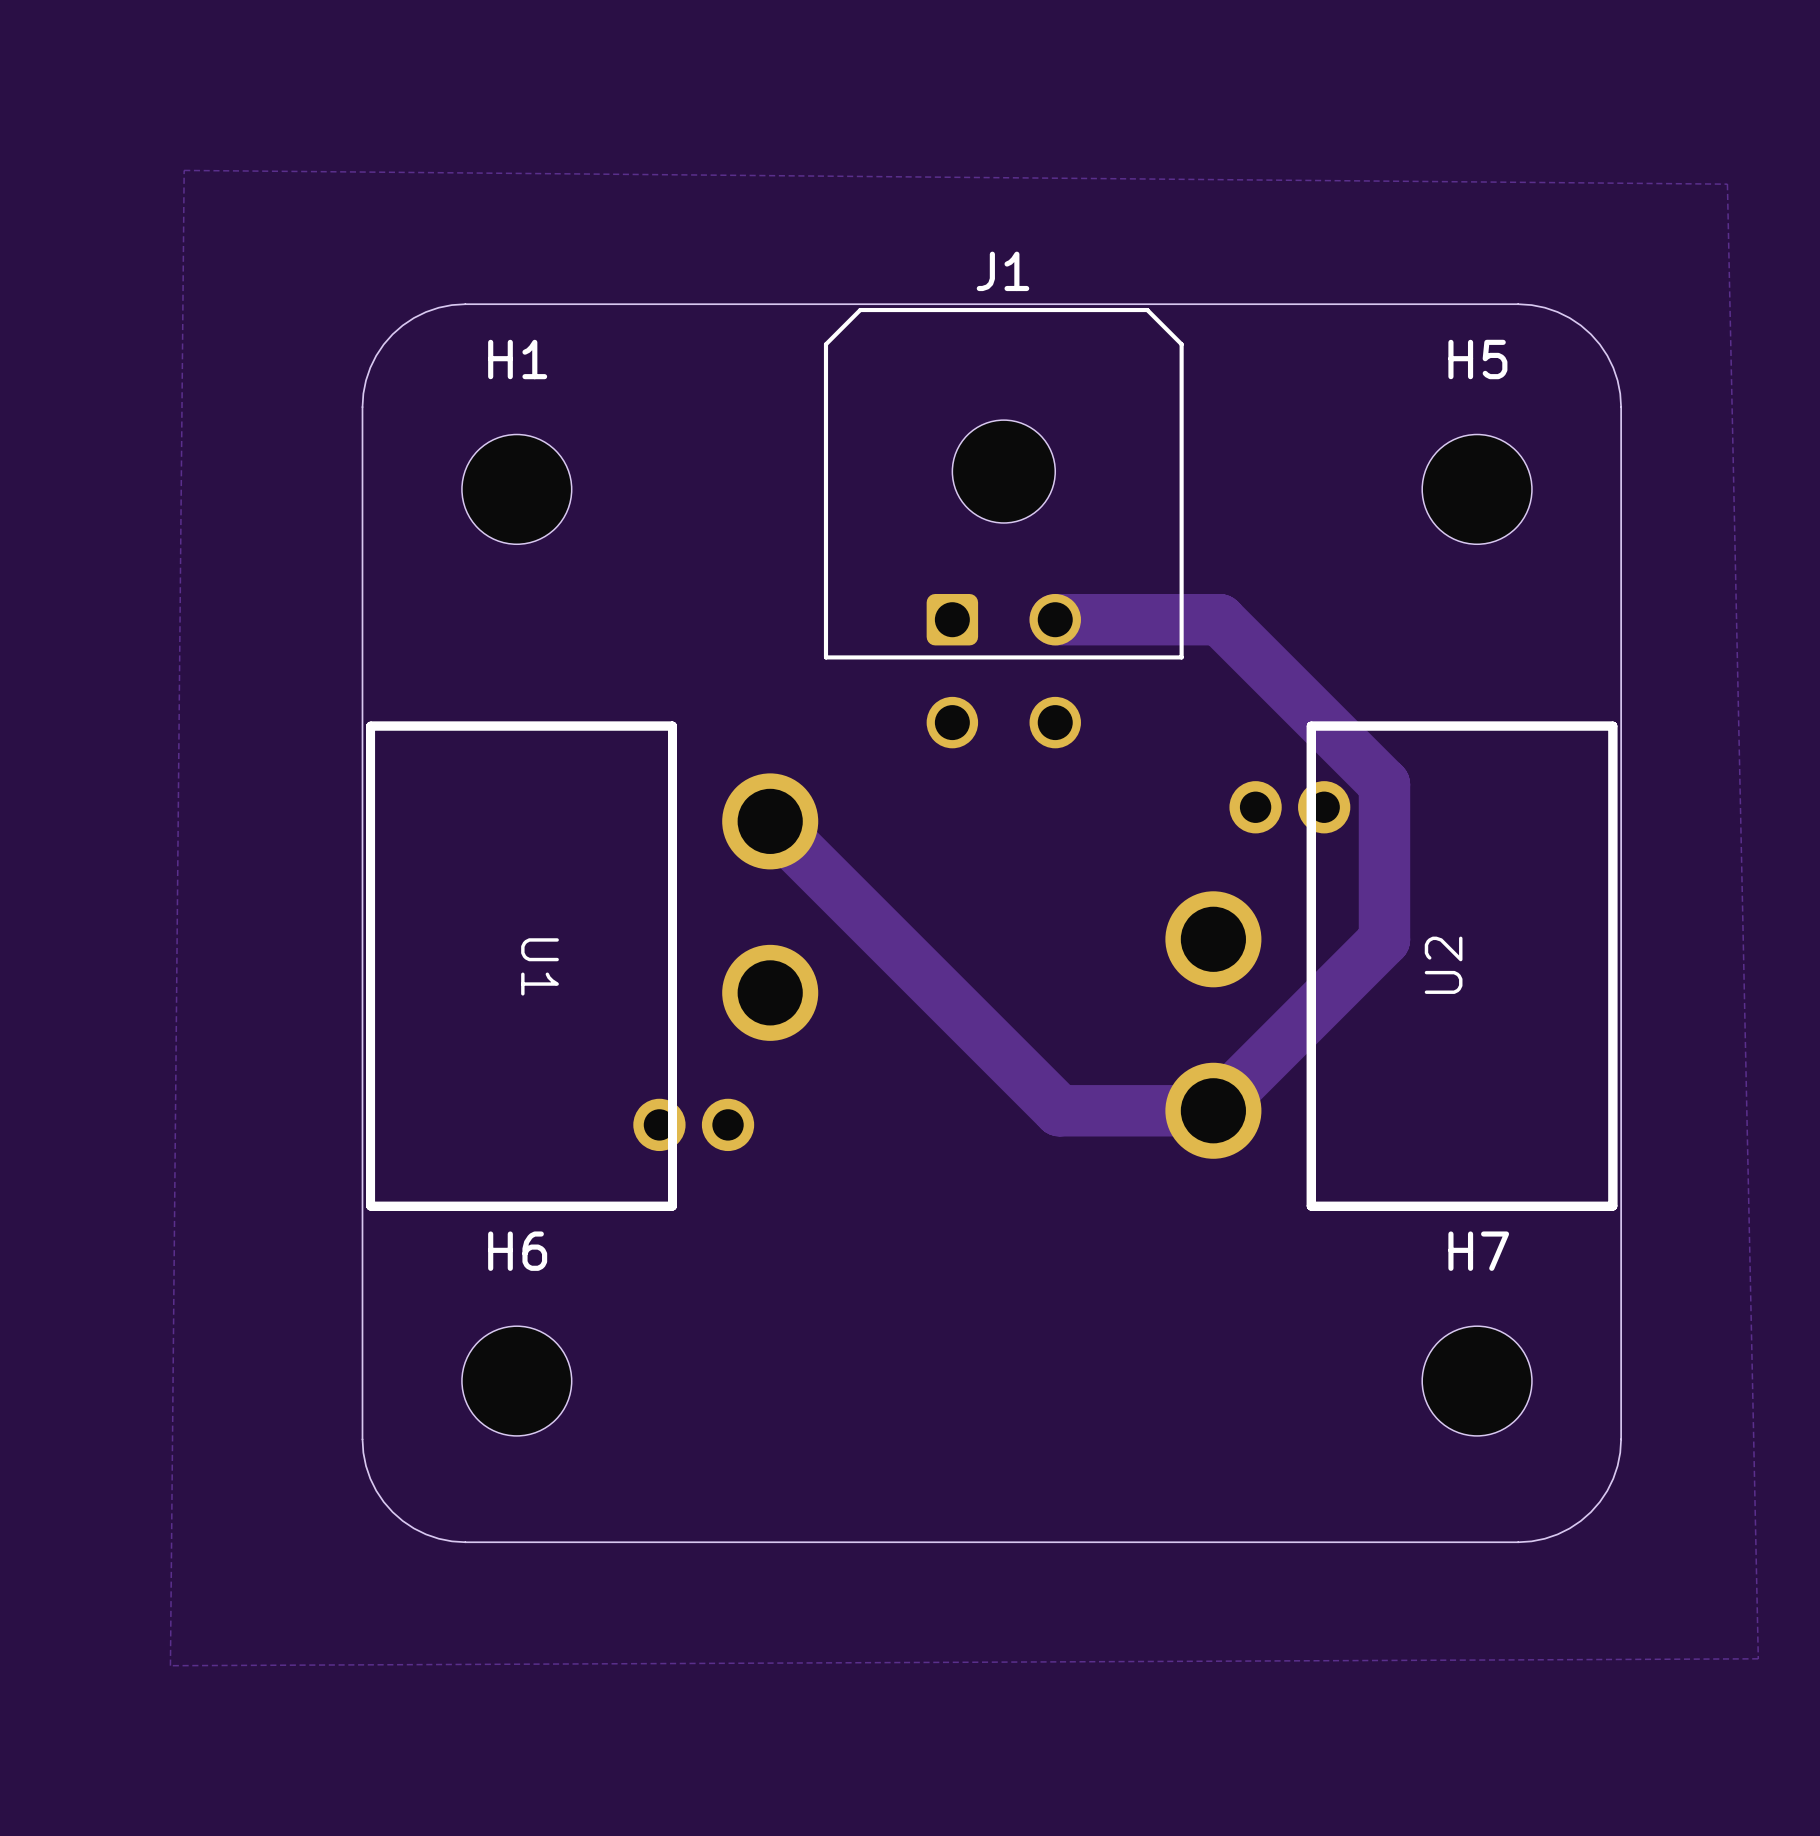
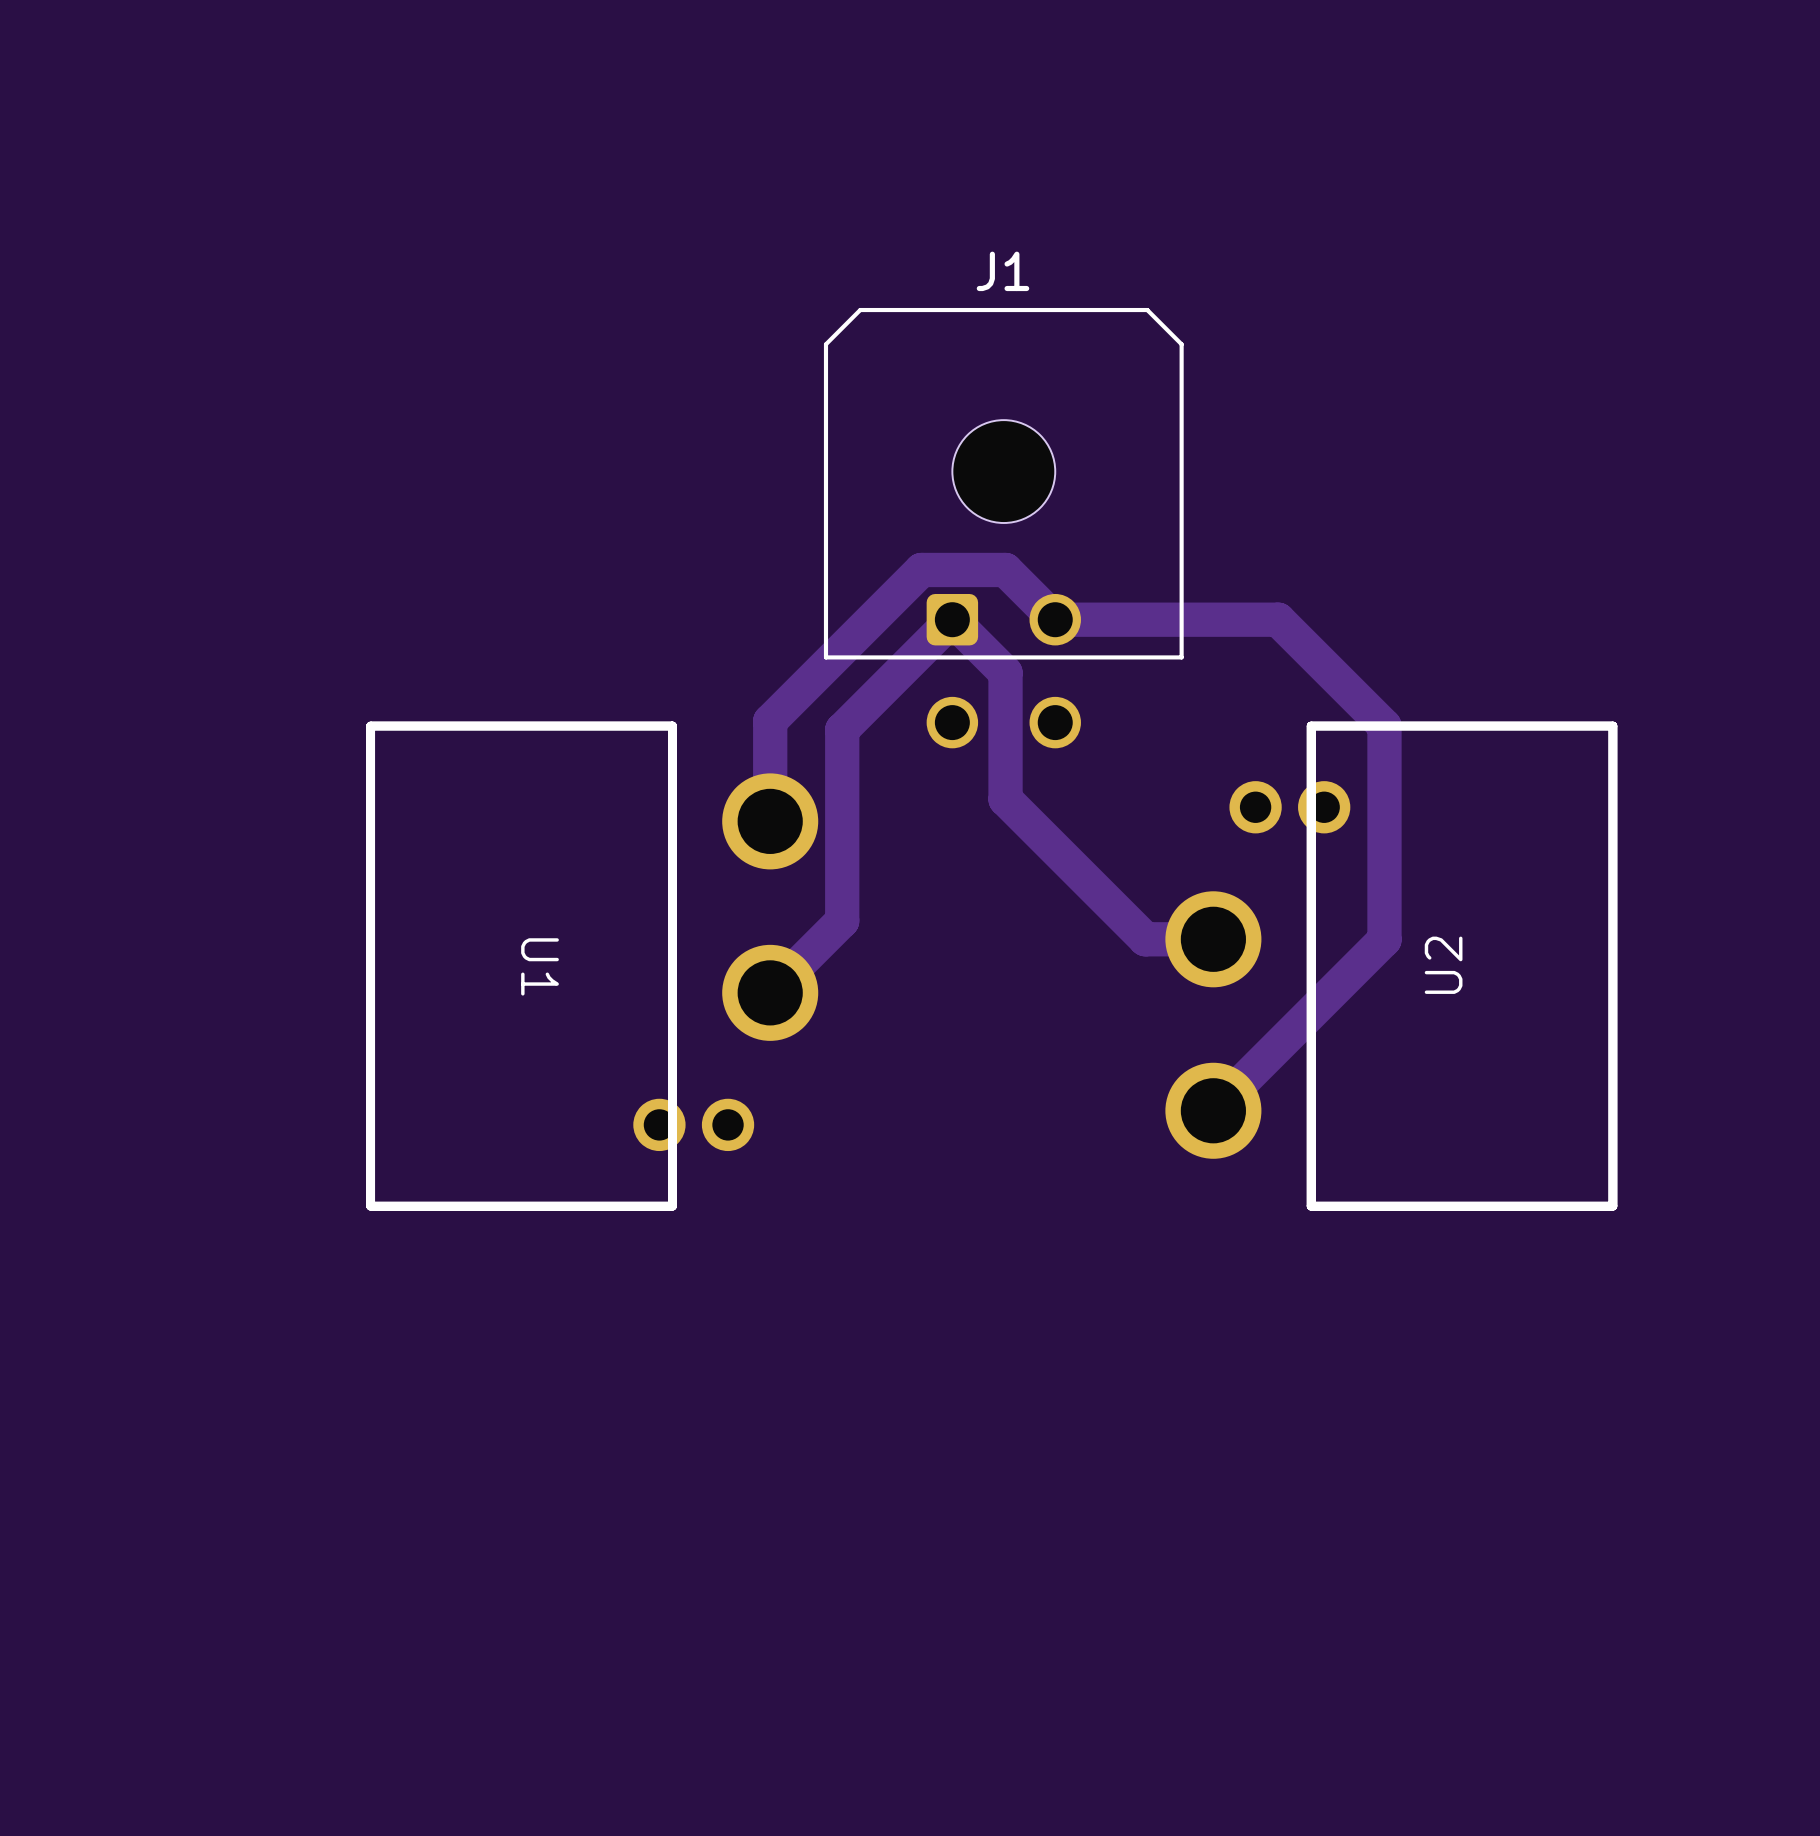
zone outline: (184, 170) (1727, 184) (1758, 1658) (170, 1665) (184, 170) -> none
board edge: (465, 304) (1518, 304) (1544, 307) (1557, 312) (1569, 317) (1590, 334) (1607, 355) (1613, 367) (1620, 393) (1621, 407) (1621, 1439) (1620, 1452) (1613, 1478) (1599, 1501) (1590, 1512) (1580, 1520) (1557, 1534) (1544, 1538) (1518, 1542) (465, 1542) (438, 1538) (426, 1534) (413, 1528) (392, 1512) (383, 1501) (370, 1478) (363, 1452) (362, 1439) (362, 407) (363, 393) (370, 367) (383, 344) (392, 334) (413, 317) (426, 312) (438, 307) (465, 304) -> none
H1: (516, 489) -> none
H5: (1477, 489) -> none
track width: thick (1055, 619) (1219, 619) -> thin (1055, 619) (1219, 619)
track: (1219, 619) (1384, 784) -> (1219, 619) (1278, 619) (1384, 726) (1384, 784)
track width: thick (1384, 784) (1384, 939) (1213, 1110) -> thin (1384, 784) (1384, 939) (1213, 1110)
track: (770, 821) (1059, 1110) (1213, 1110) -> (770, 821) (770, 721) (921, 569) (1005, 569) (1055, 619)
track: none -> (1213, 939) (1145, 939) (1005, 799) (1005, 672) (952, 619) (842, 729) (842, 920) (770, 992)
H6: (516, 1381) -> none
H7: (1477, 1381) -> none

